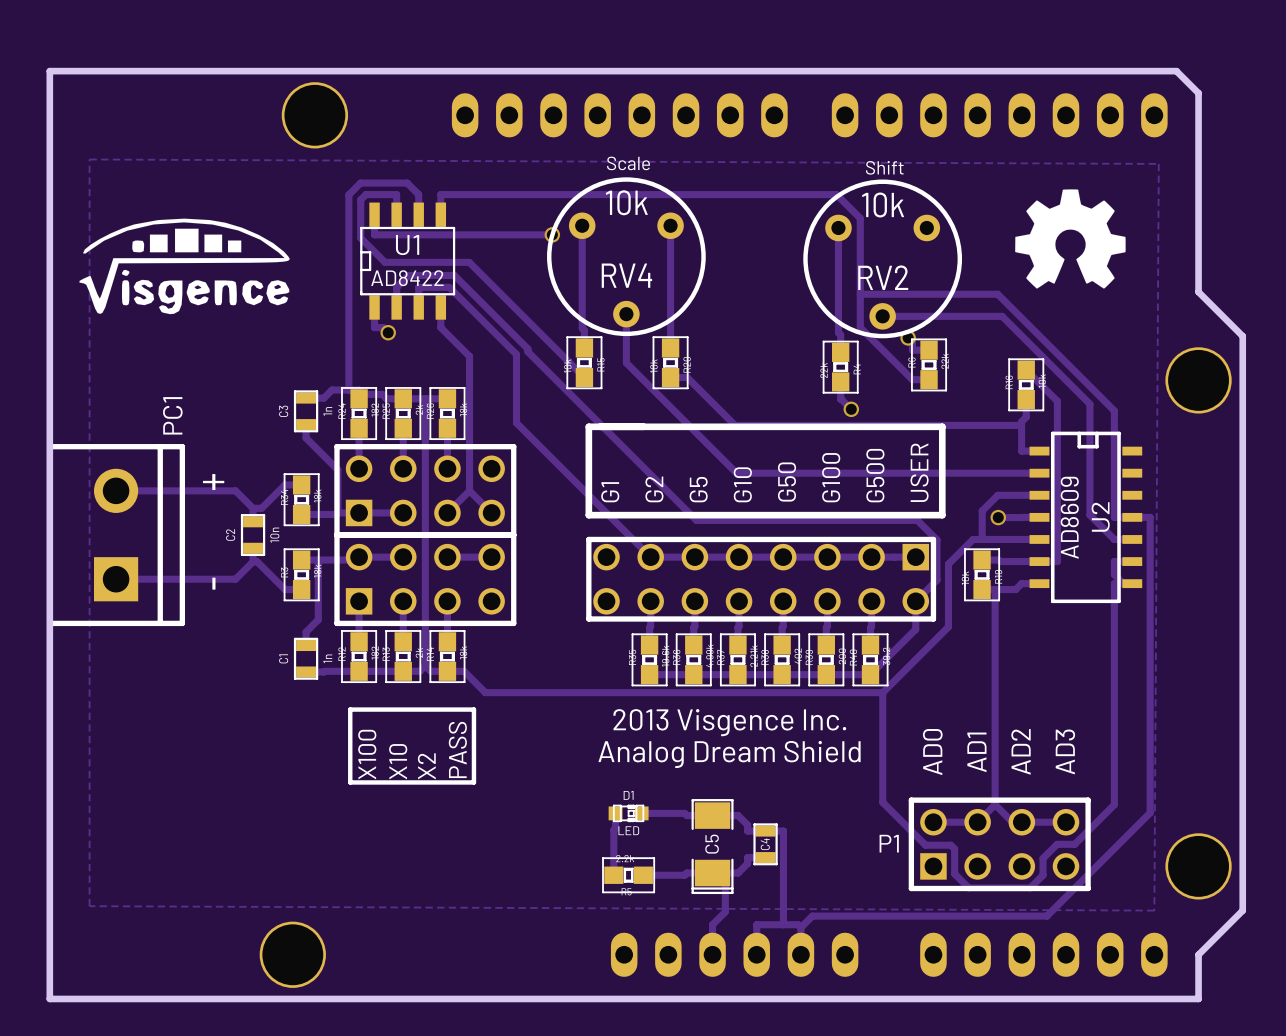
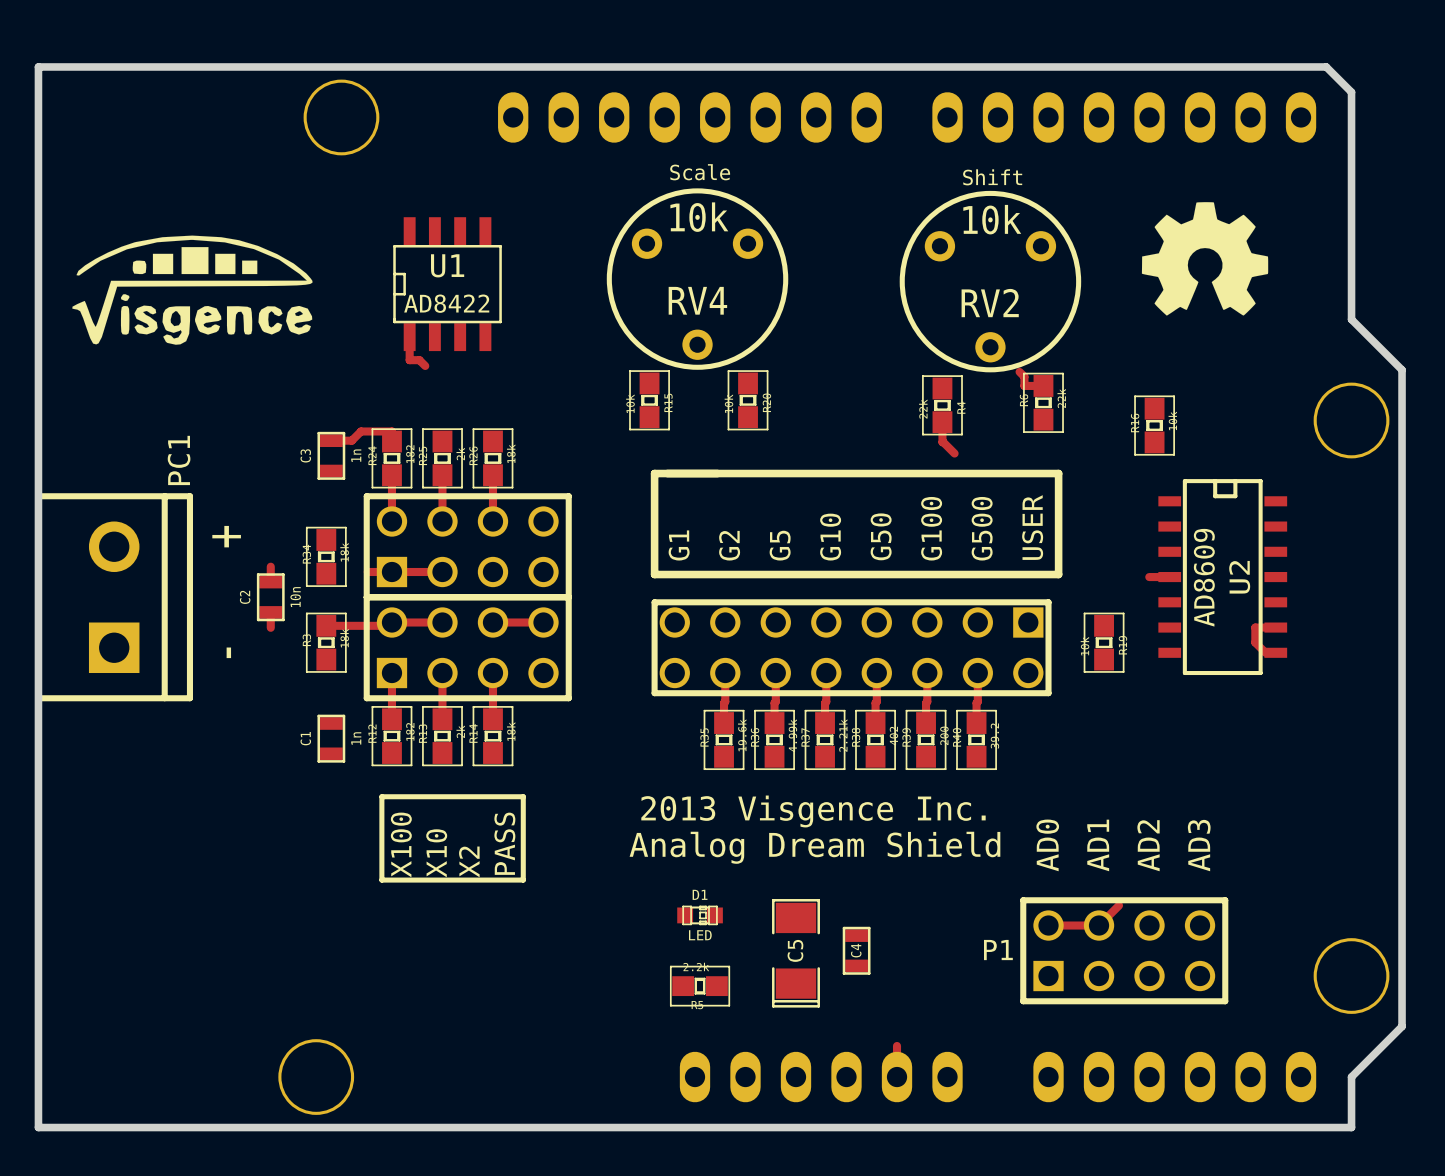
zone outline: (89, 159) (1158, 163) (1154, 910) (89, 906) (89, 159) -> none
track: (374, 214) (374, 234) (552, 234) -> none
track: (396, 214) (396, 194) (365, 194) (360, 199) (360, 238) (385, 262) (469, 262) (584, 377) -> none
track: (418, 214) (418, 194) (407, 183) (360, 183) (348, 194) (348, 390) -> none
track: (440, 214) (440, 194) (836, 194) (860, 218) (860, 327) (912, 379) (929, 379) -> none
track: (582, 225) (582, 328) (584, 330) (584, 347) -> none
track: (670, 225) (670, 347) -> none
track: (838, 227) (838, 332) (840, 334) (840, 352) -> none
via: (552, 234) -> none
track: (860, 294) (997, 294) (1114, 410) (1114, 517) (1150, 517) (1150, 812) (1046, 916) (812, 916) (800, 927) (798, 924) (756, 924) (756, 954) -> none
track: (396, 307) (396, 287) (408, 275) (454, 275) (696, 520) (917, 520) (937, 539) (937, 580) (915, 601) (915, 629) (870, 674) (649, 674) -> none
track: (418, 307) (418, 287) (449, 287) (516, 354) (516, 422) (650, 557) (915, 557) -> none
track: (440, 307) (440, 327) (469, 356) (469, 490) -> none
track: (626, 314) (626, 362) (736, 473) (1039, 473) -> none
track: (882, 316) (1002, 316) (1089, 404) (1089, 515) (1114, 539) (1132, 539) -> none
via: (388, 332) -> none
via: (908, 337) -> none
track: (1026, 370) (1057, 401) (1057, 561) (982, 560) -> none
track: (670, 377) (687, 377) (735, 425) (1021, 425) -> none
track: (359, 394) (382, 394) (386, 398) (447, 398) -> none
track: (425, 398) (425, 665) -> none
track: (1026, 399) (1026, 417) (1021, 421) (1021, 451) (1039, 451) -> none
via: (851, 409) -> none
track: (306, 424) (306, 438) (337, 469) (337, 512) (301, 514) -> none
track: (301, 484) (285, 484) (261, 508) (253, 508) (235, 490) (116, 490) -> none
track: (469, 490) (447, 512) -> none
track: (469, 490) (491, 512) -> none
track: (1039, 495) (997, 495) (982, 510) (982, 539) -> none
track: (998, 517) (1021, 517) -> none
via: (998, 517) -> none
track: (1039, 539) (973, 539) (948, 564) (948, 626) (882, 692) -> none
track: (318, 560) (318, 619) (306, 632) (306, 645) -> none
track: (116, 579) (235, 579) (253, 561) (257, 561) (285, 589) (301, 589) -> none
track: (1039, 583) (1021, 583) (1015, 589) (982, 589) -> none
track: (1132, 583) (1114, 583) (1114, 804) (1074, 844) (1057, 844) (1043, 858) (1043, 875) (1030, 887) (968, 887) (954, 873) (954, 848) (950, 845) (925, 845) (882, 802) (882, 692) -> none
track: (995, 589) (995, 804) (1012, 822) (1066, 822) -> none
track: (425, 665) (419, 671) (306, 672) -> none
track: (425, 665) (430, 671) (464, 671) (485, 692) (882, 692) -> none
track: (615, 813) (613, 875) -> none
track: (641, 813) (738, 815) (747, 825) (747, 831) (783, 831) (783, 924) -> none
track: (765, 857) (747, 857) (747, 863) (738, 873) (643, 875) -> none
track: (725, 873) (725, 911) (712, 924) (712, 954) -> none

